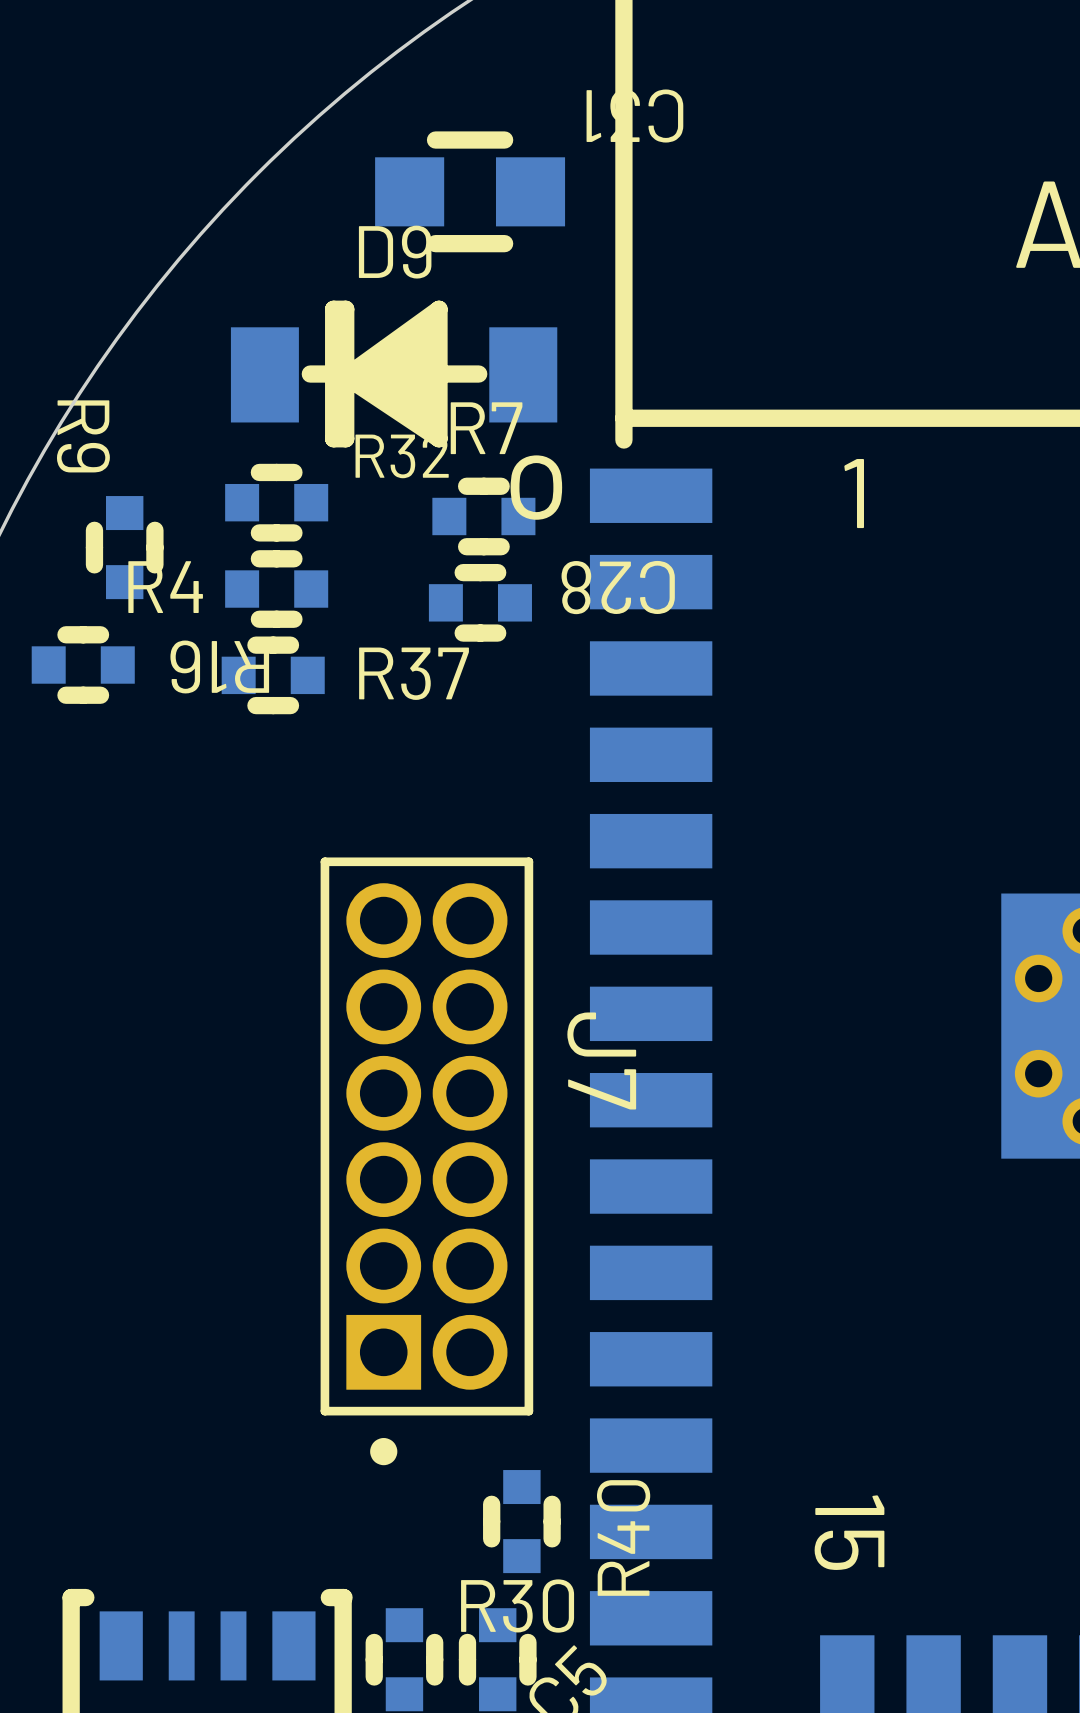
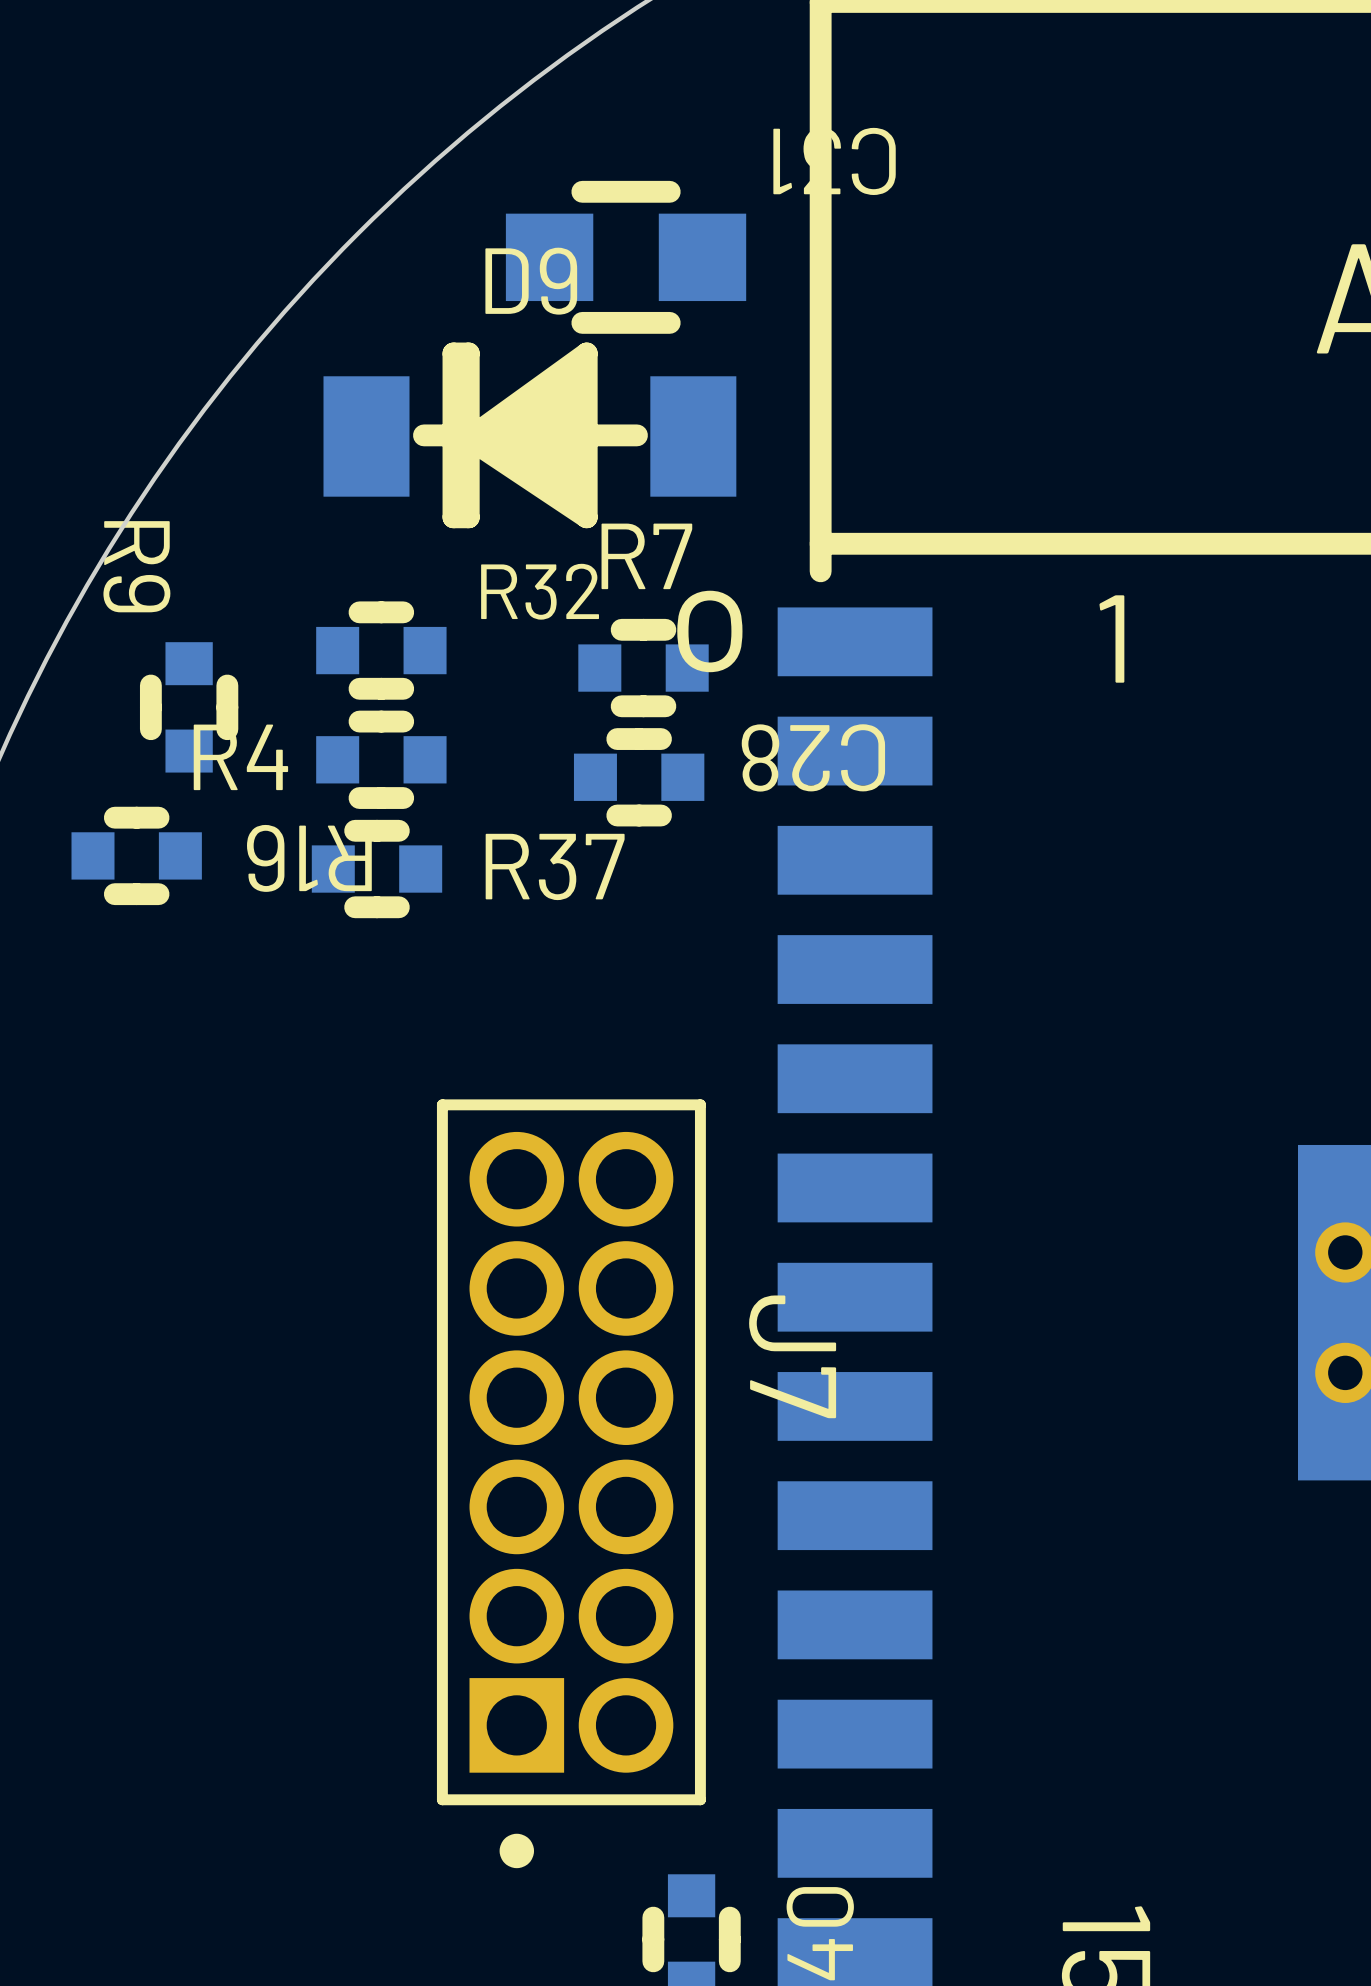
D9 position: (394, 374) -> (529, 435)

